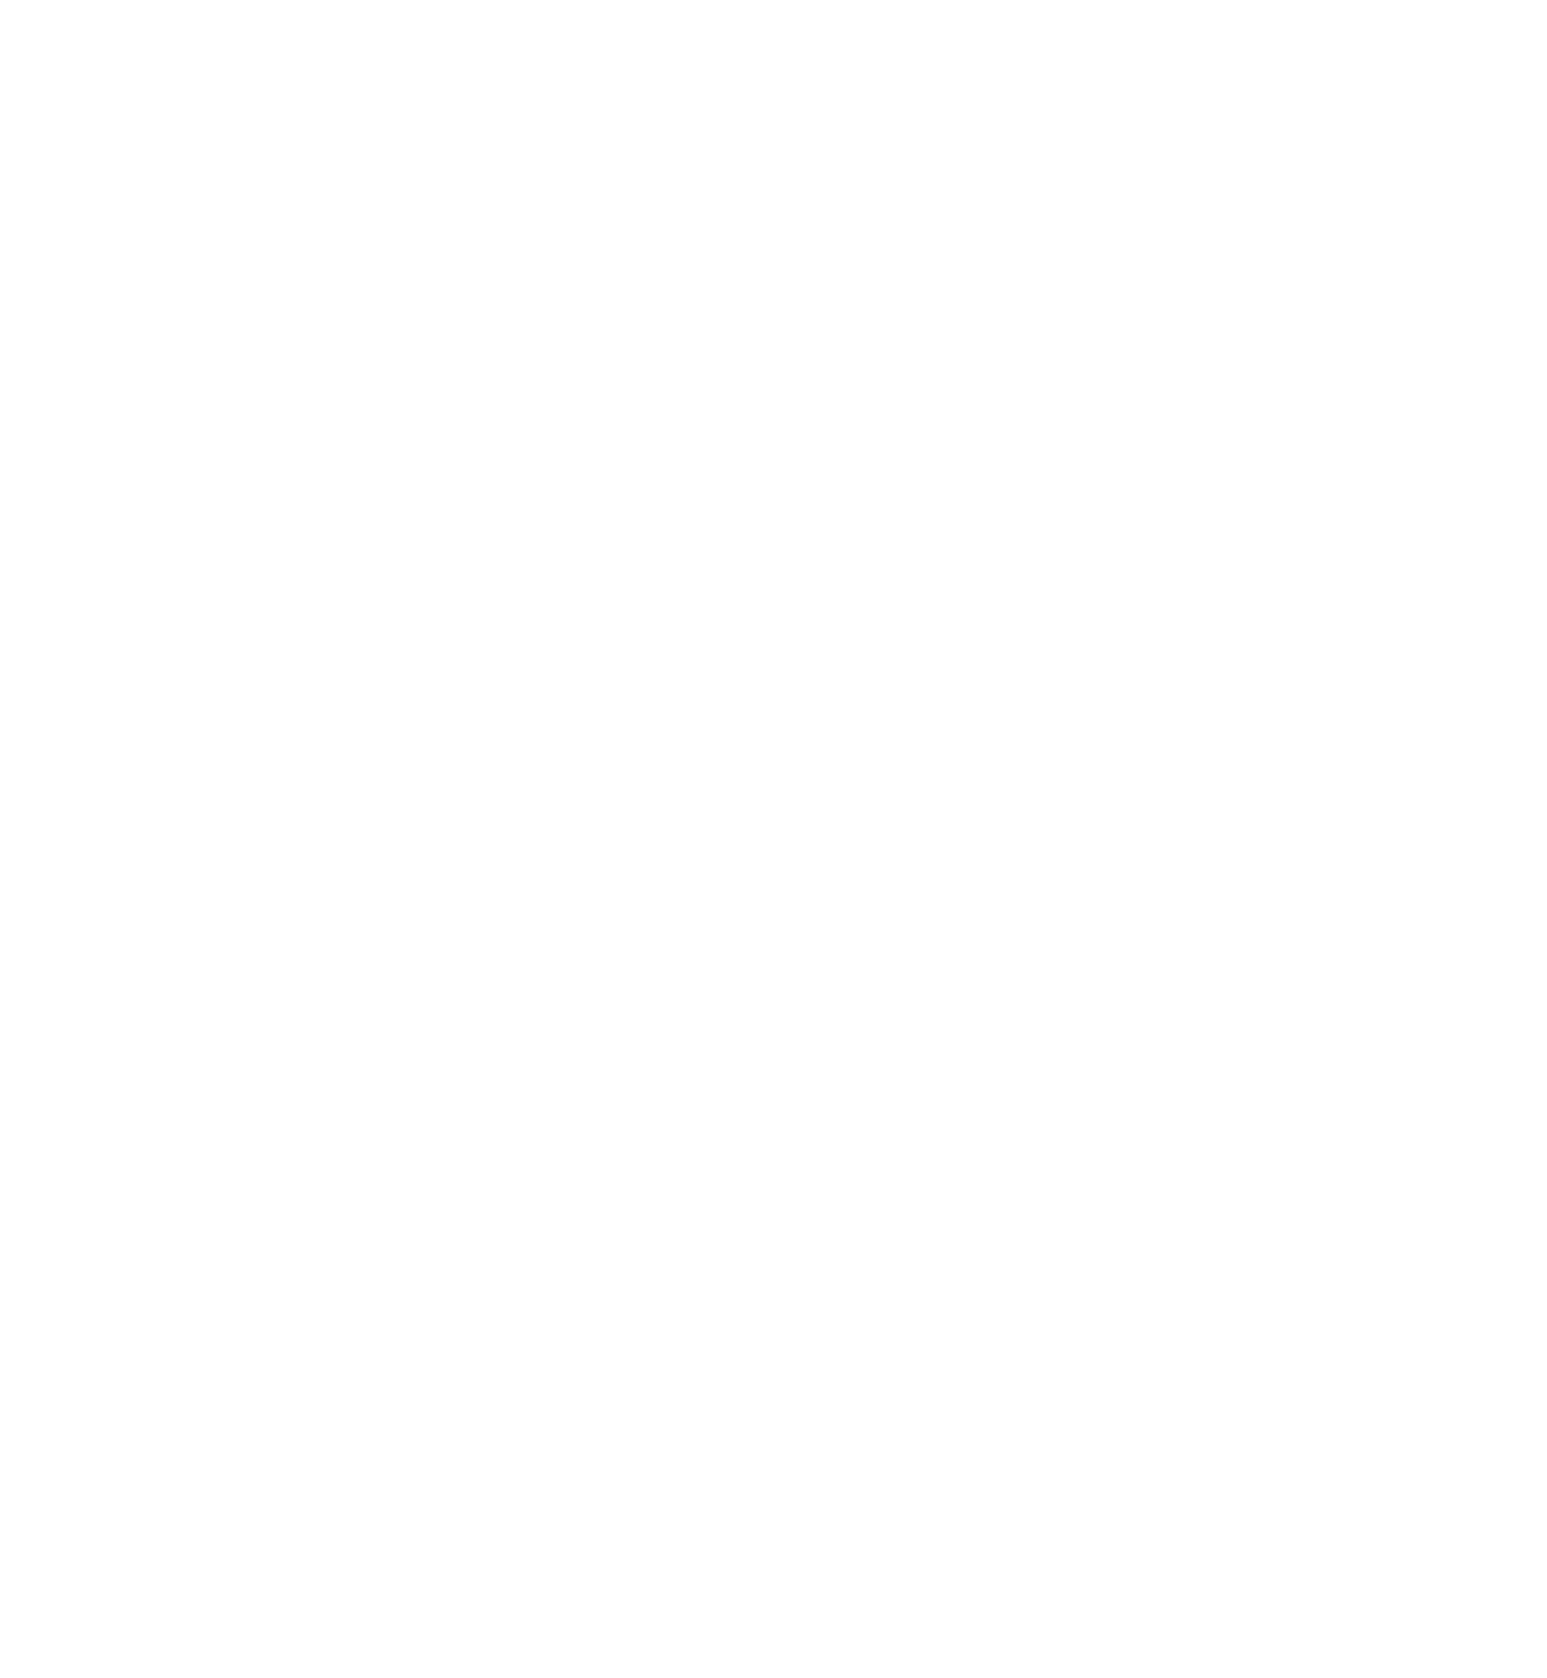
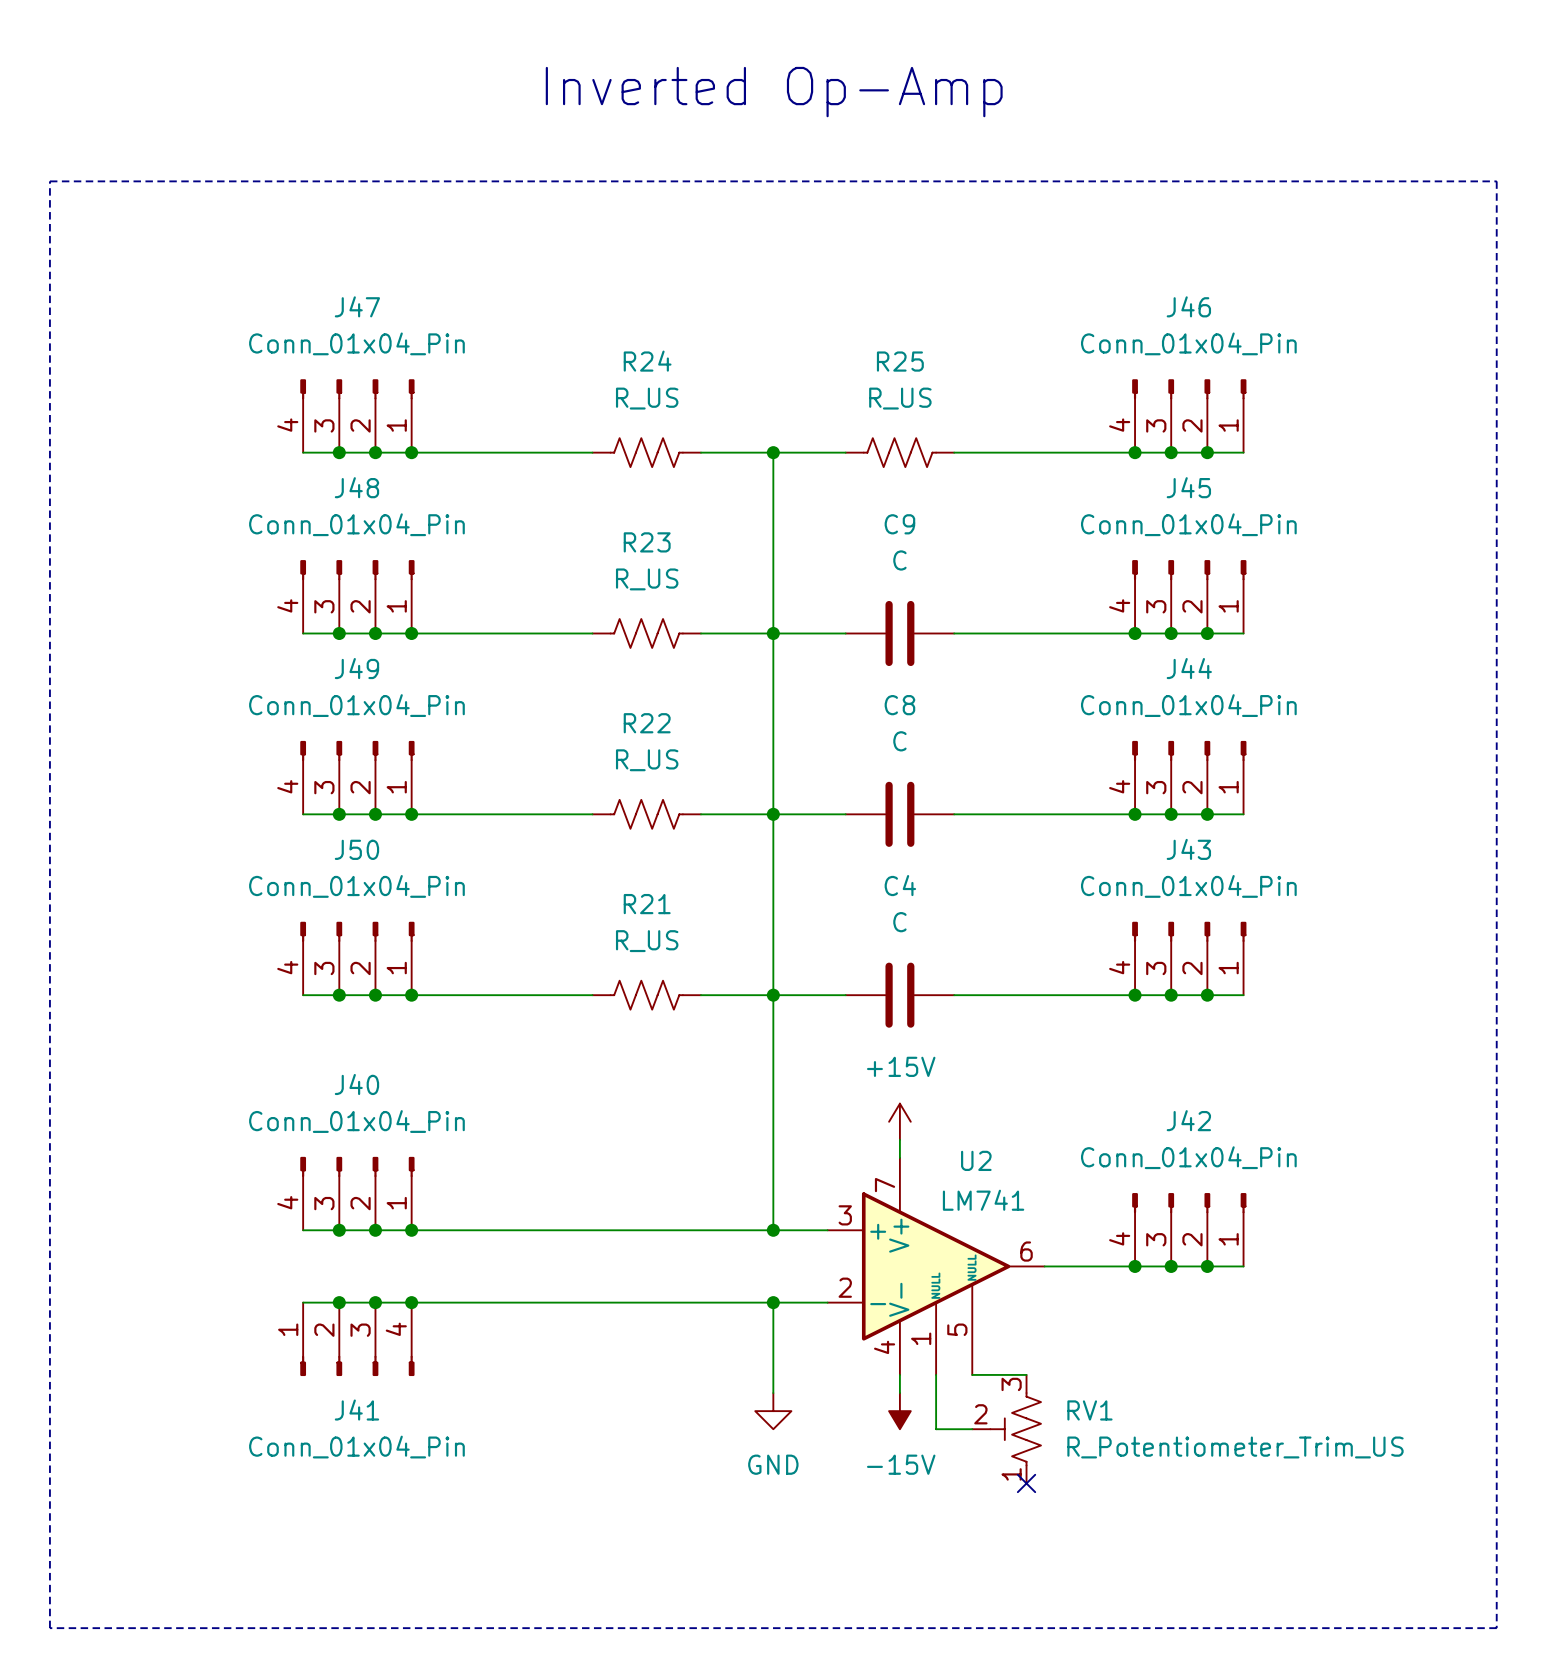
text: none -> Inverted Op-Amp (774, 92)
line: none -> (49, 181) (1496, 181) (1496, 1628) (49, 1628) (49, 181)
J47: none -> Conn_01x04_Pin (357, 415)
J46: none -> Conn_01x04_Pin (1189, 415)
wire: none -> (303, 452) (592, 452)
junction: none -> (339, 452)
junction: none -> (375, 452)
junction: none -> (411, 452)
R24: none -> R_US (646, 452)
wire: none -> (701, 452) (845, 452)
wire: none -> (773, 452) (773, 1230)
junction: none -> (773, 452)
R25: none -> R_US (899, 452)
wire: none -> (954, 452) (1243, 452)
junction: none -> (1135, 452)
junction: none -> (1171, 452)
junction: none -> (1207, 452)
J48: none -> Conn_01x04_Pin (357, 596)
J45: none -> Conn_01x04_Pin (1189, 596)
wire: none -> (303, 633) (592, 633)
junction: none -> (339, 633)
junction: none -> (375, 633)
junction: none -> (411, 633)
R23: none -> R_US (646, 633)
wire: none -> (701, 633) (845, 633)
junction: none -> (773, 633)
C9: none -> C (899, 633)
wire: none -> (954, 633) (1243, 633)
junction: none -> (1135, 633)
junction: none -> (1171, 633)
junction: none -> (1207, 633)
J49: none -> Conn_01x04_Pin (357, 777)
J44: none -> Conn_01x04_Pin (1189, 777)
wire: none -> (303, 814) (592, 814)
junction: none -> (339, 814)
junction: none -> (375, 814)
junction: none -> (411, 814)
R22: none -> R_US (646, 814)
wire: none -> (701, 814) (845, 814)
junction: none -> (773, 814)
C8: none -> C (899, 814)
wire: none -> (954, 814) (1243, 814)
junction: none -> (1135, 814)
junction: none -> (1171, 814)
junction: none -> (1207, 814)
J50: none -> Conn_01x04_Pin (357, 958)
J43: none -> Conn_01x04_Pin (1189, 958)
wire: none -> (303, 995) (592, 995)
junction: none -> (339, 995)
junction: none -> (375, 995)
junction: none -> (411, 995)
R21: none -> R_US (646, 995)
wire: none -> (701, 995) (845, 995)
junction: none -> (773, 995)
C4: none -> C (899, 995)
wire: none -> (954, 995) (1243, 995)
junction: none -> (1135, 995)
junction: none -> (1171, 995)
junction: none -> (1207, 995)
power symbol: none -> +15V (899, 1121)
wire: none -> (899, 1139) (899, 1157)
J40: none -> Conn_01x04_Pin (357, 1193)
J42: none -> Conn_01x04_Pin (1189, 1229)
wire: none -> (303, 1230) (827, 1230)
junction: none -> (339, 1230)
junction: none -> (375, 1230)
junction: none -> (411, 1230)
junction: none -> (773, 1230)
U2: none -> LM741 (936, 1266)
wire: none -> (1044, 1266) (1243, 1266)
junction: none -> (1135, 1266)
junction: none -> (1171, 1266)
junction: none -> (1207, 1266)
wire: none -> (303, 1302) (827, 1302)
junction: none -> (339, 1302)
junction: none -> (375, 1302)
junction: none -> (411, 1302)
wire: none -> (773, 1302) (773, 1393)
junction: none -> (773, 1302)
J41: none -> Conn_01x04_Pin (357, 1339)
wire: none -> (899, 1374) (899, 1393)
wire: none -> (936, 1374) (936, 1429) (972, 1429)
wire: none -> (972, 1374) (1026, 1374)
power symbol: none -> GND (773, 1411)
power symbol: none -> -15V (899, 1411)
RV1: none -> R_Potentiometer_Trim_US (1006, 1429)
no-connect mark: none -> (1026, 1483)

